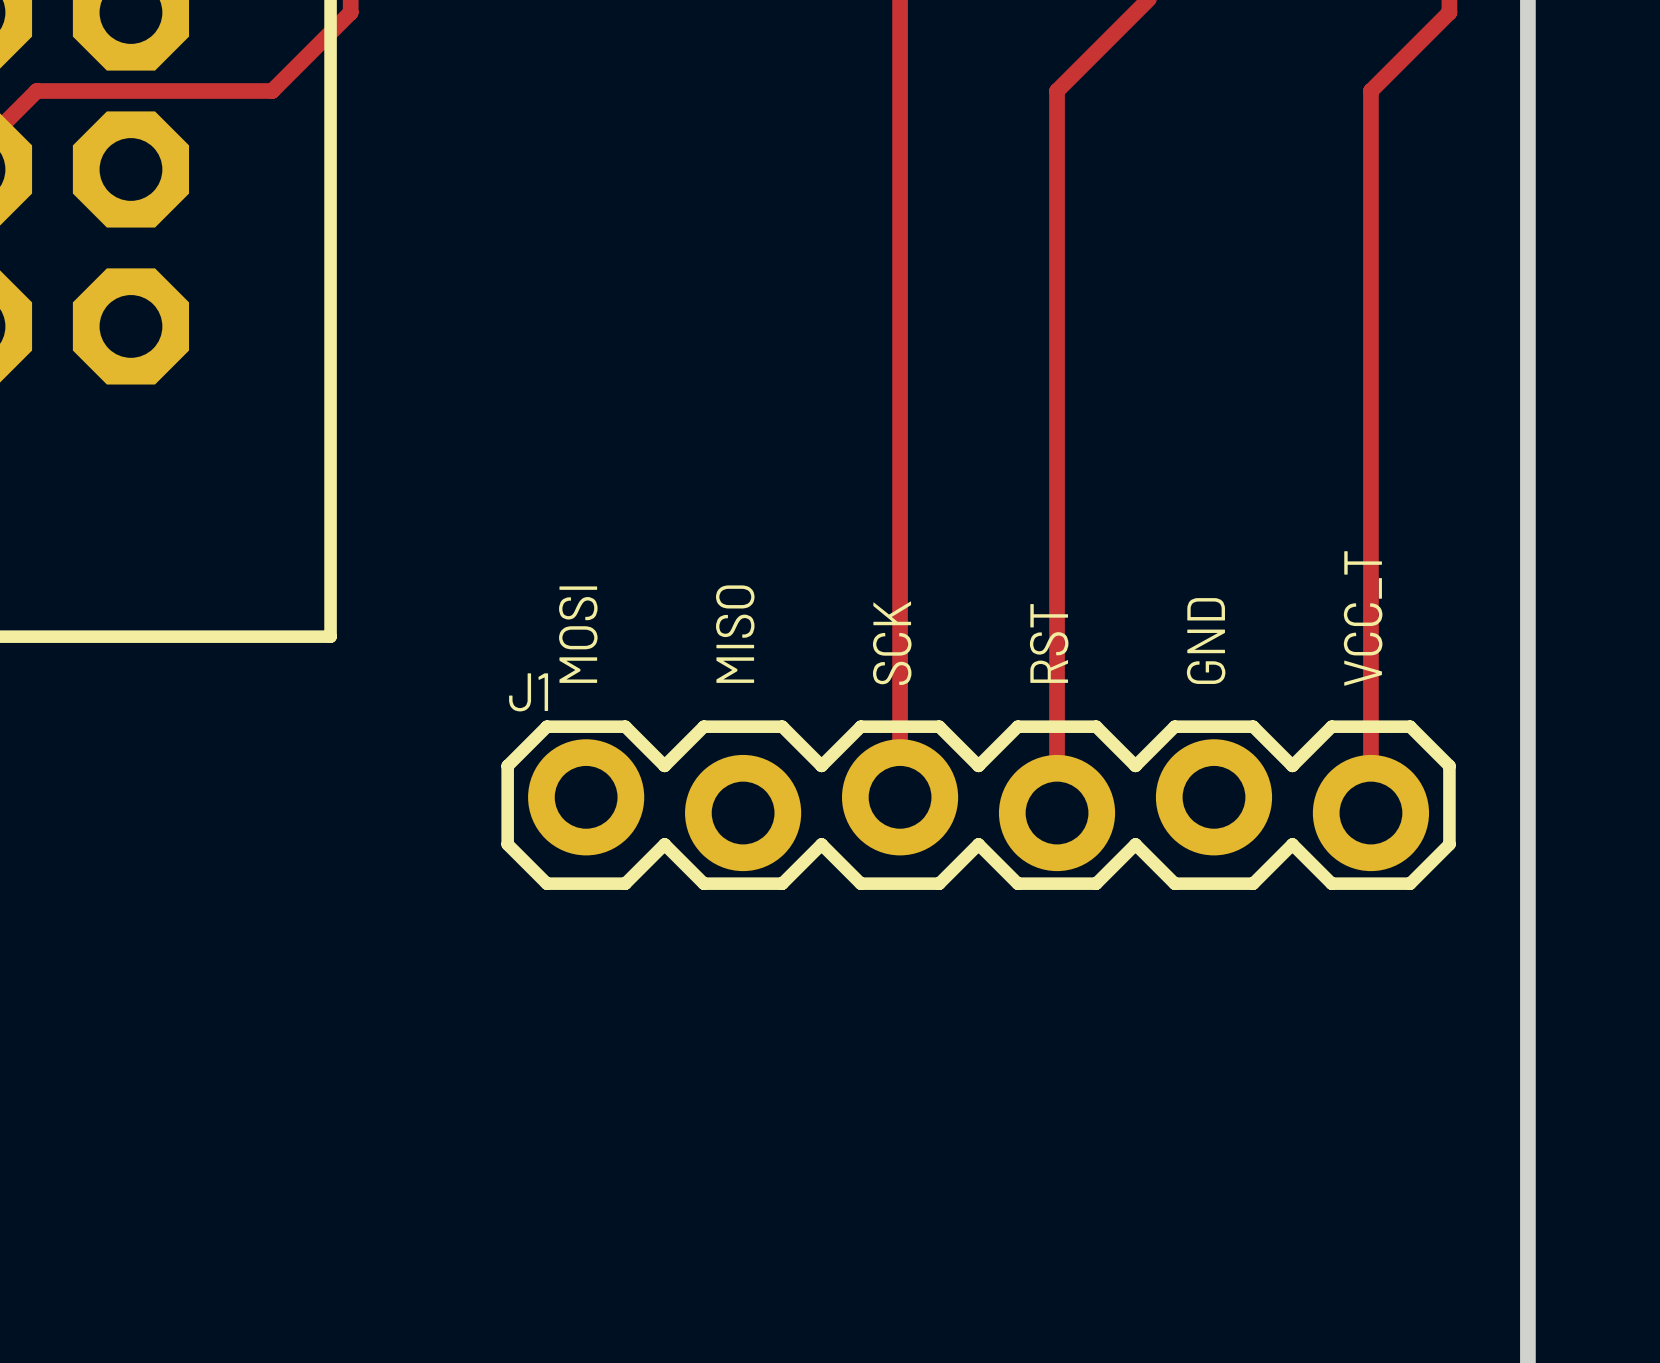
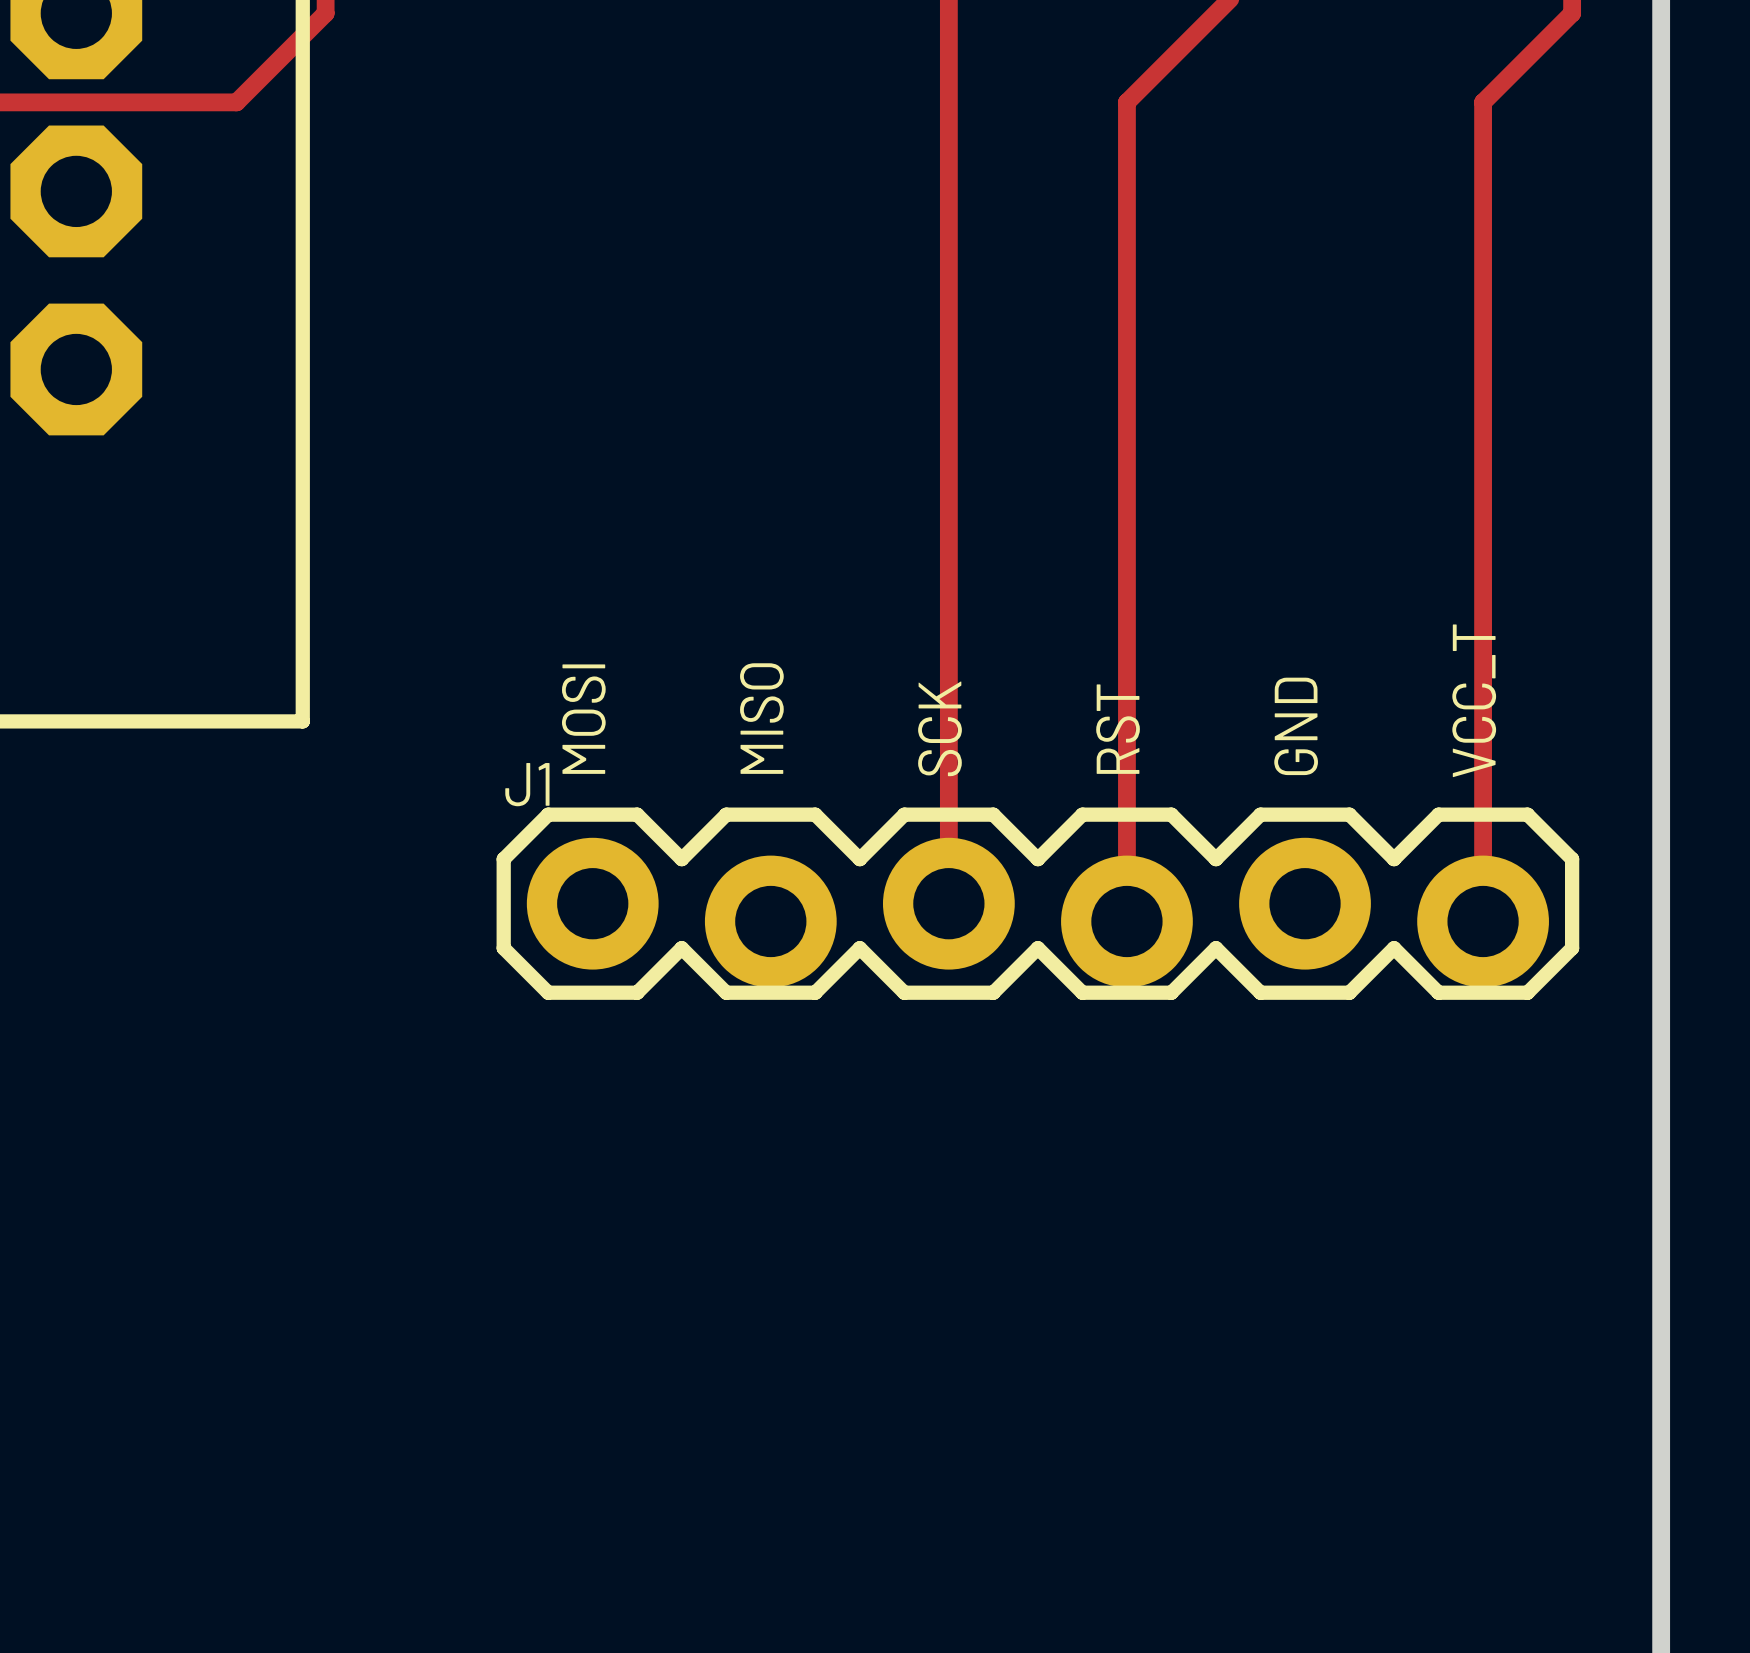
J1 footprint: [501, 720, 1456, 890] -> [496, 807, 1580, 1000]

